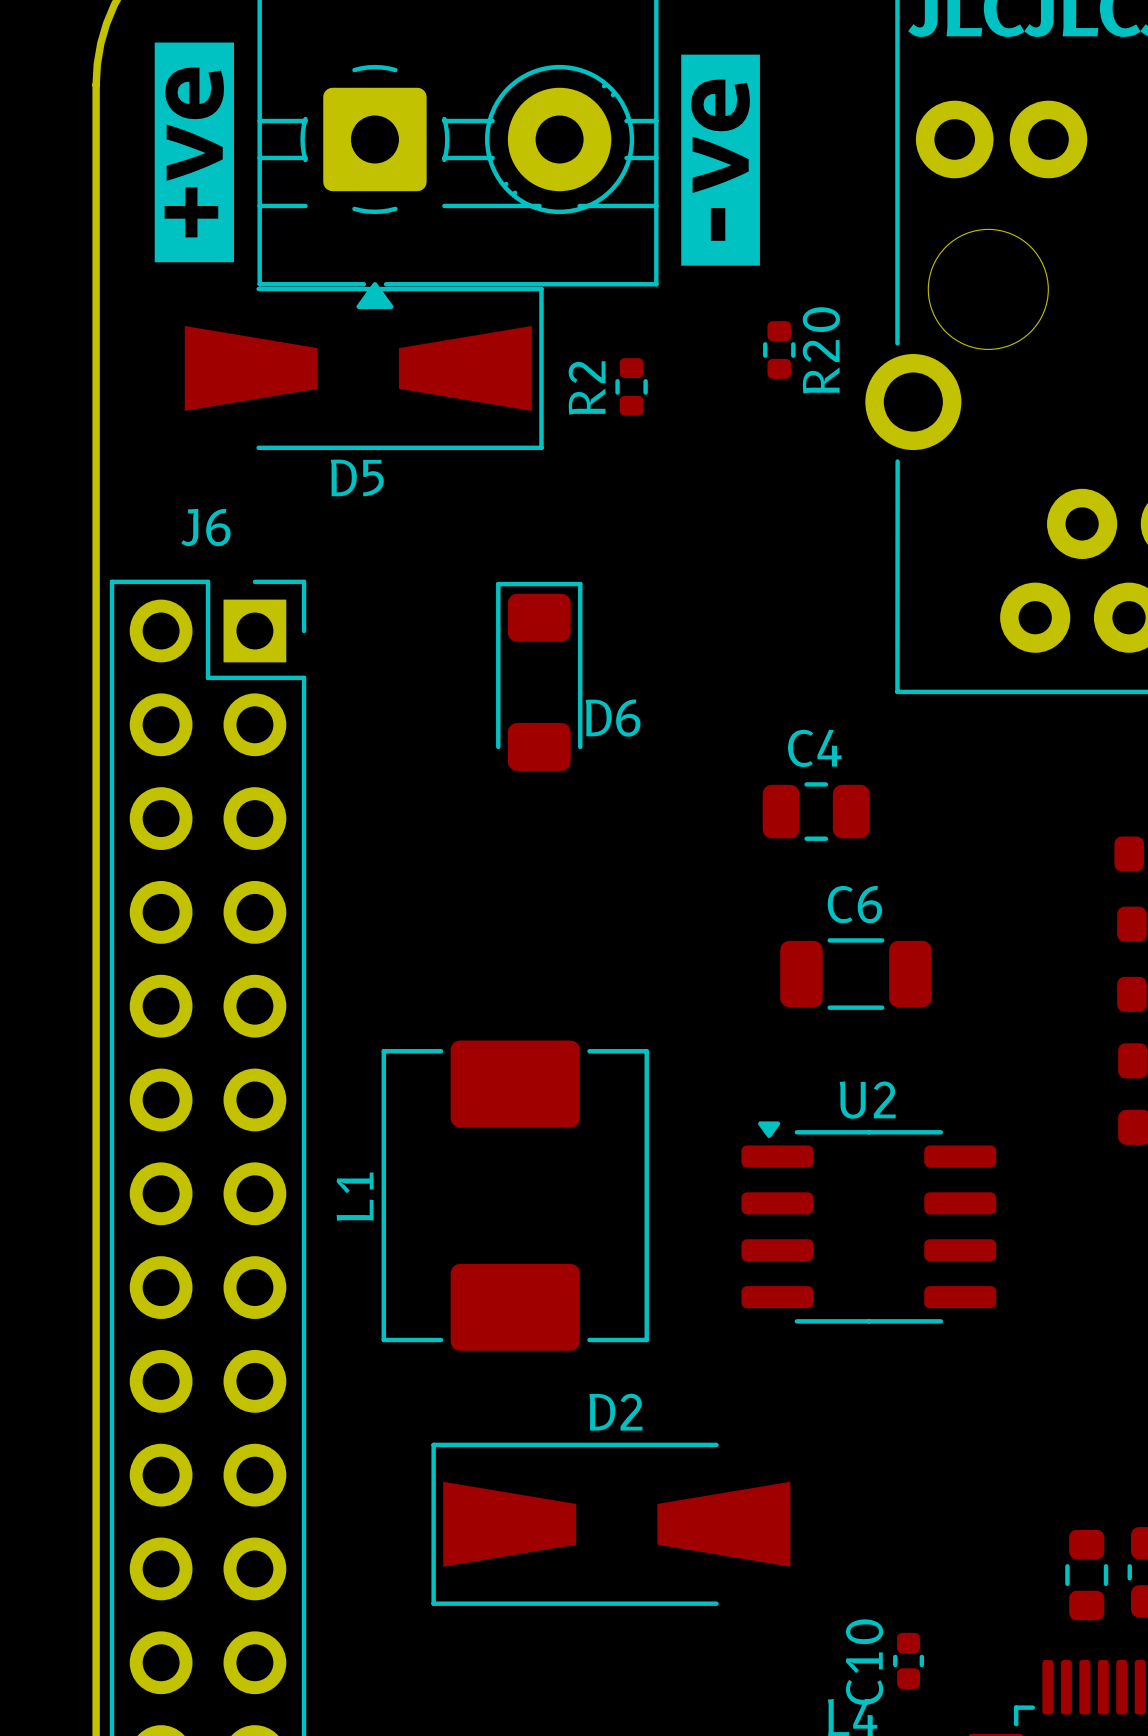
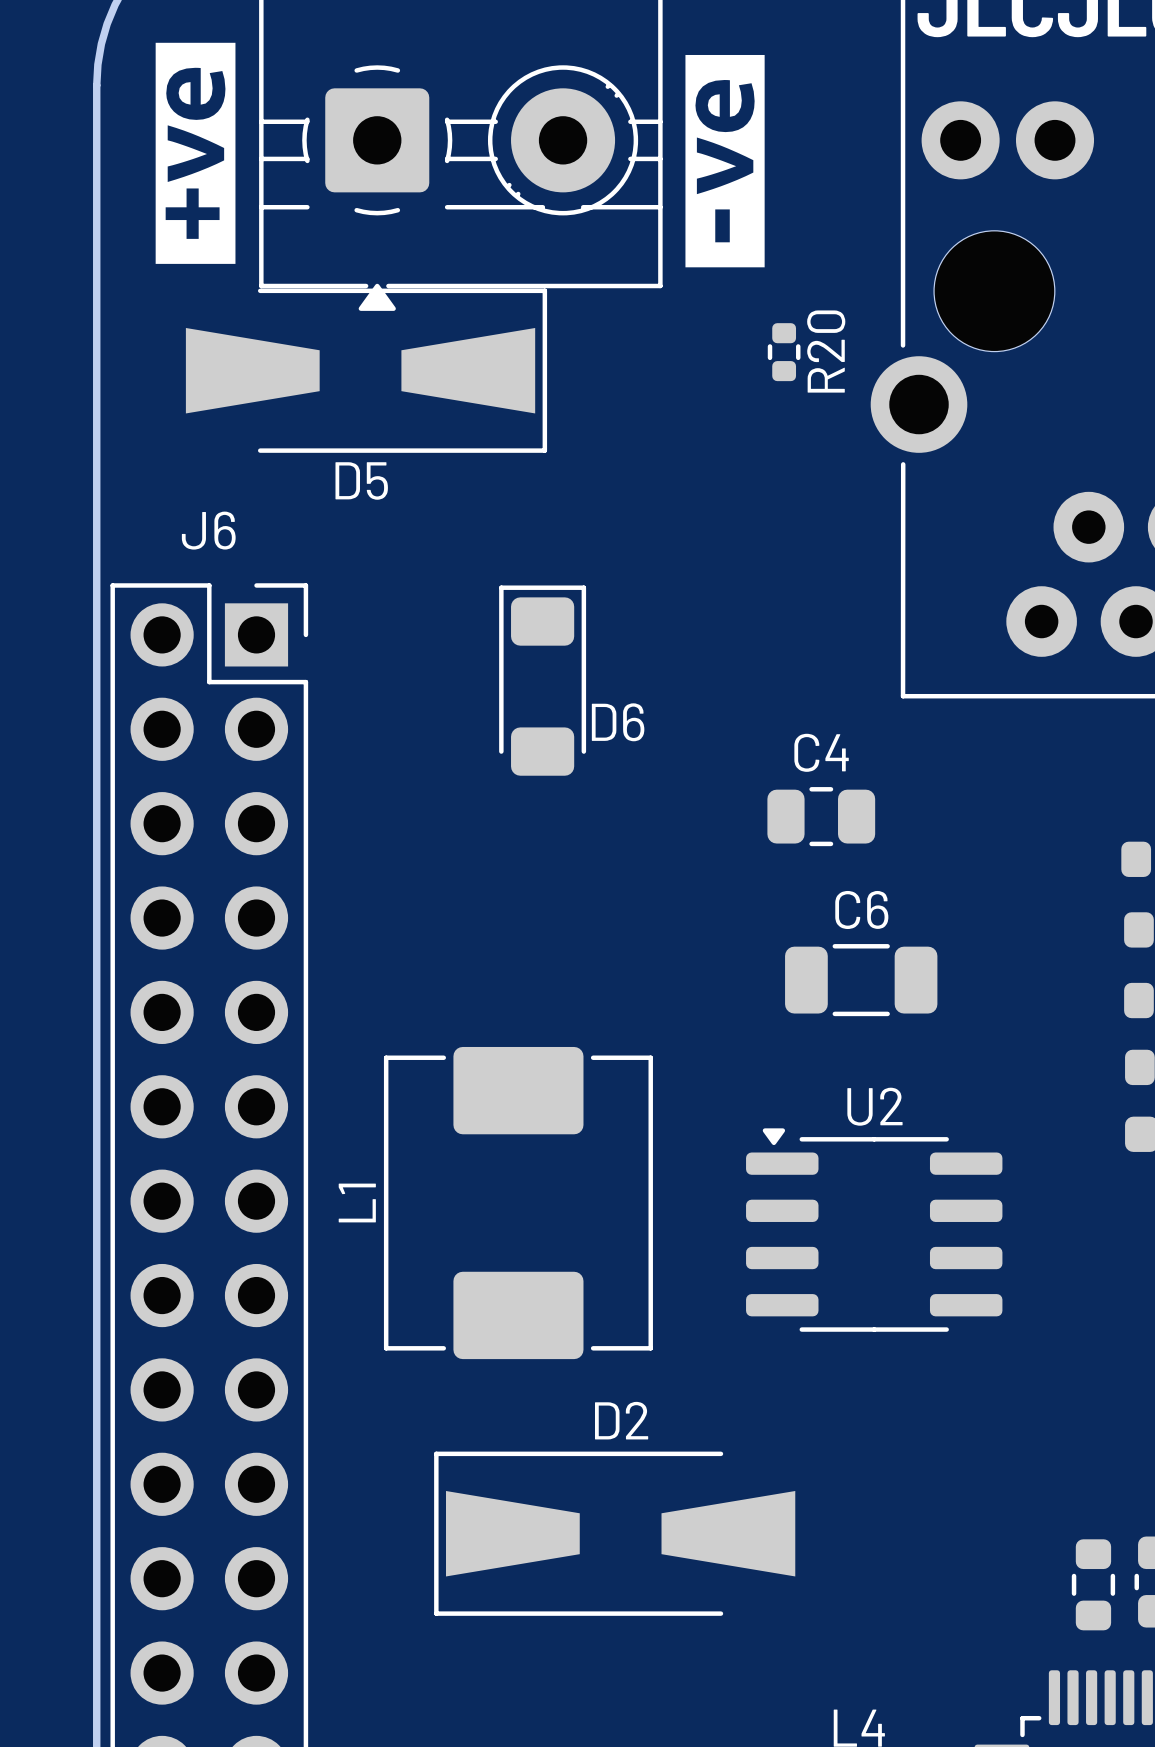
R2: (631, 386) -> none
C10: (908, 1660) -> none

